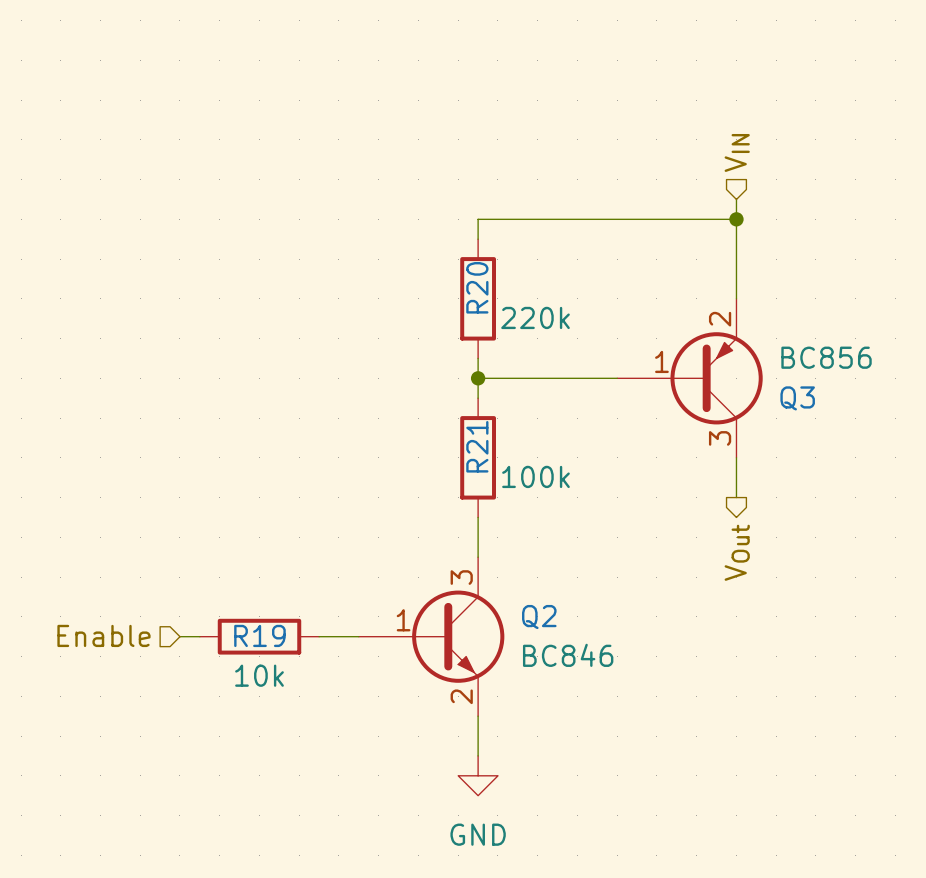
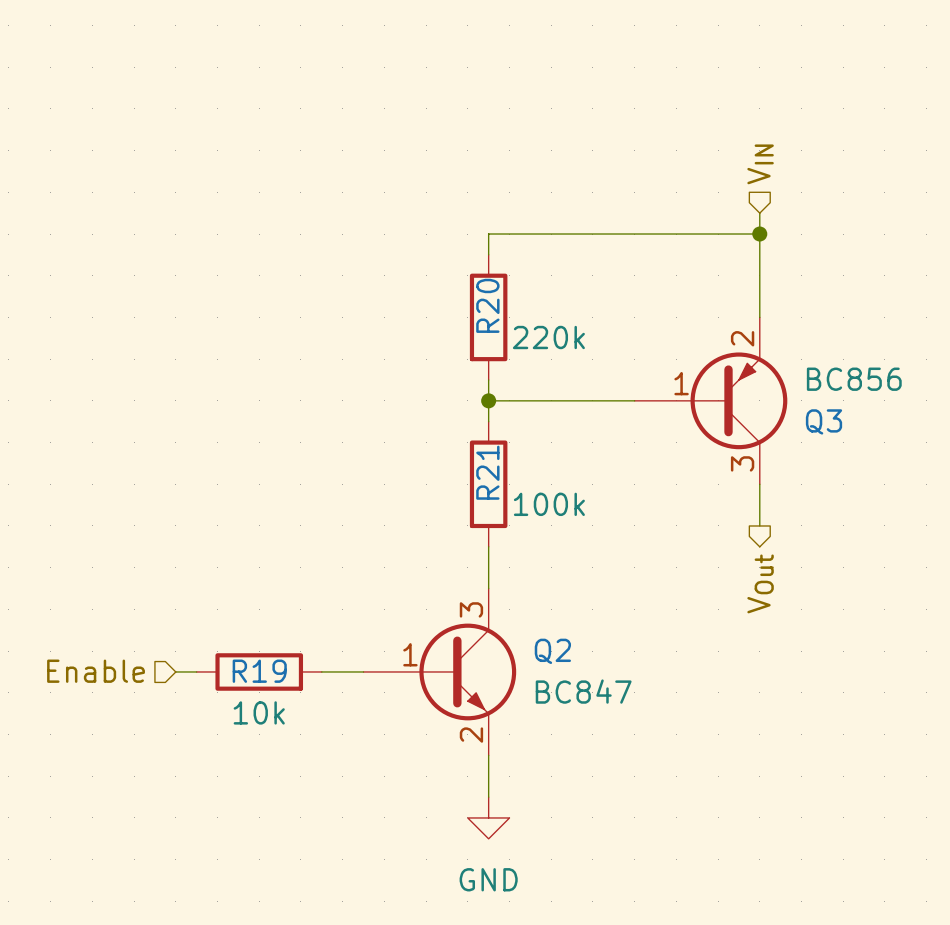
Q2 value: BC846 (568, 655) -> BC847 (583, 691)

